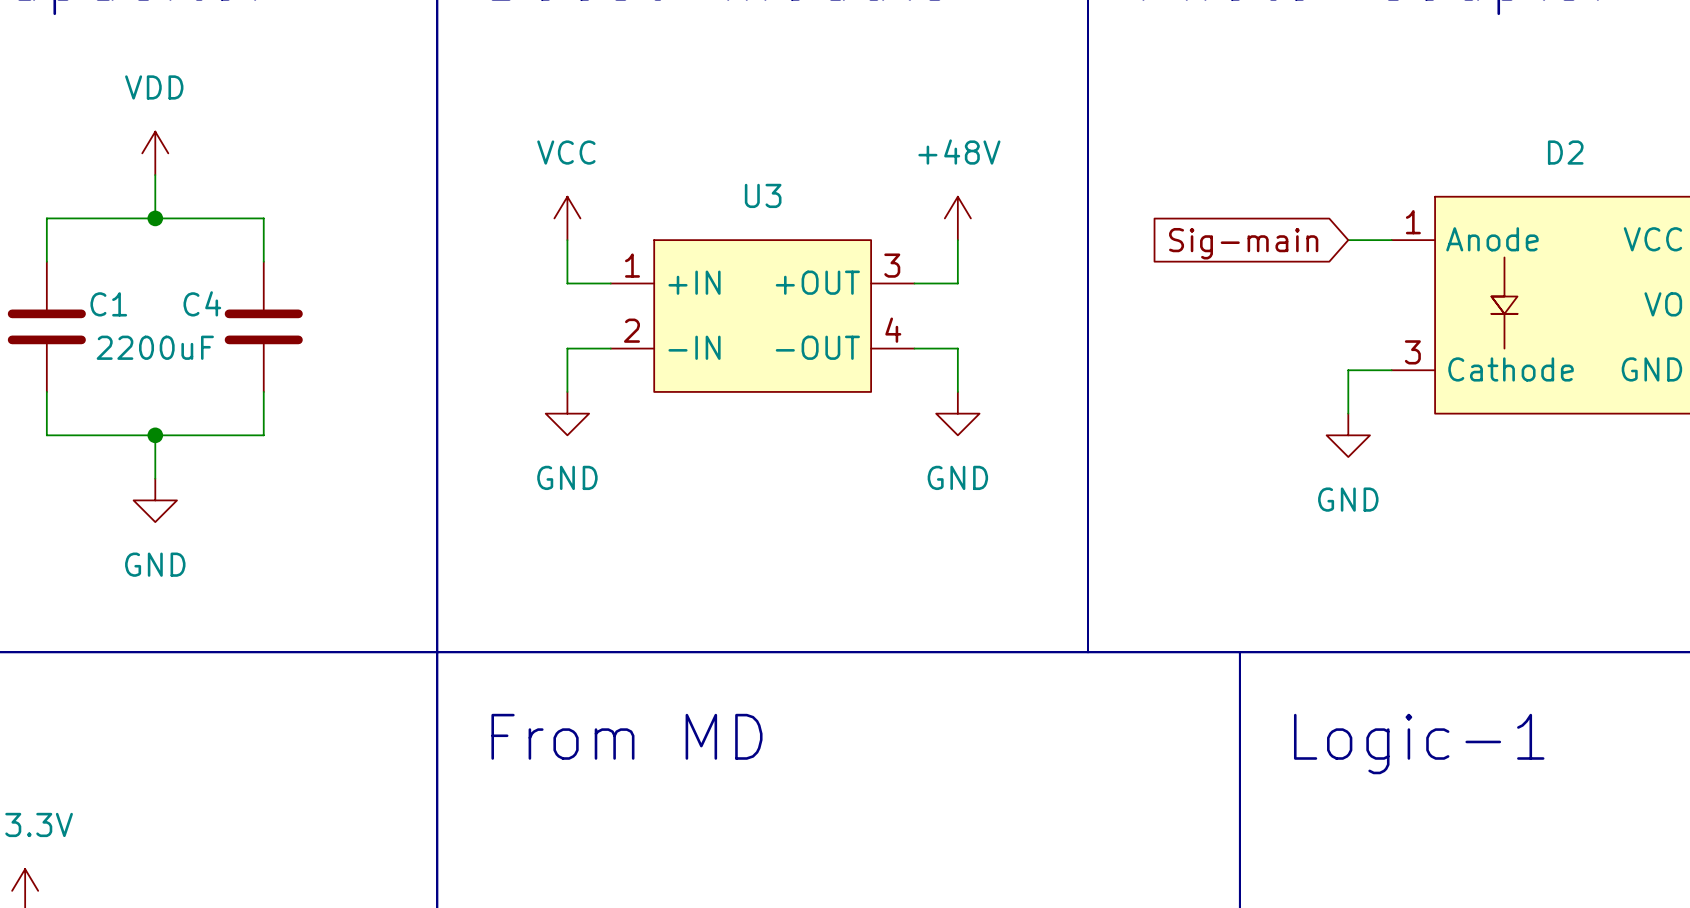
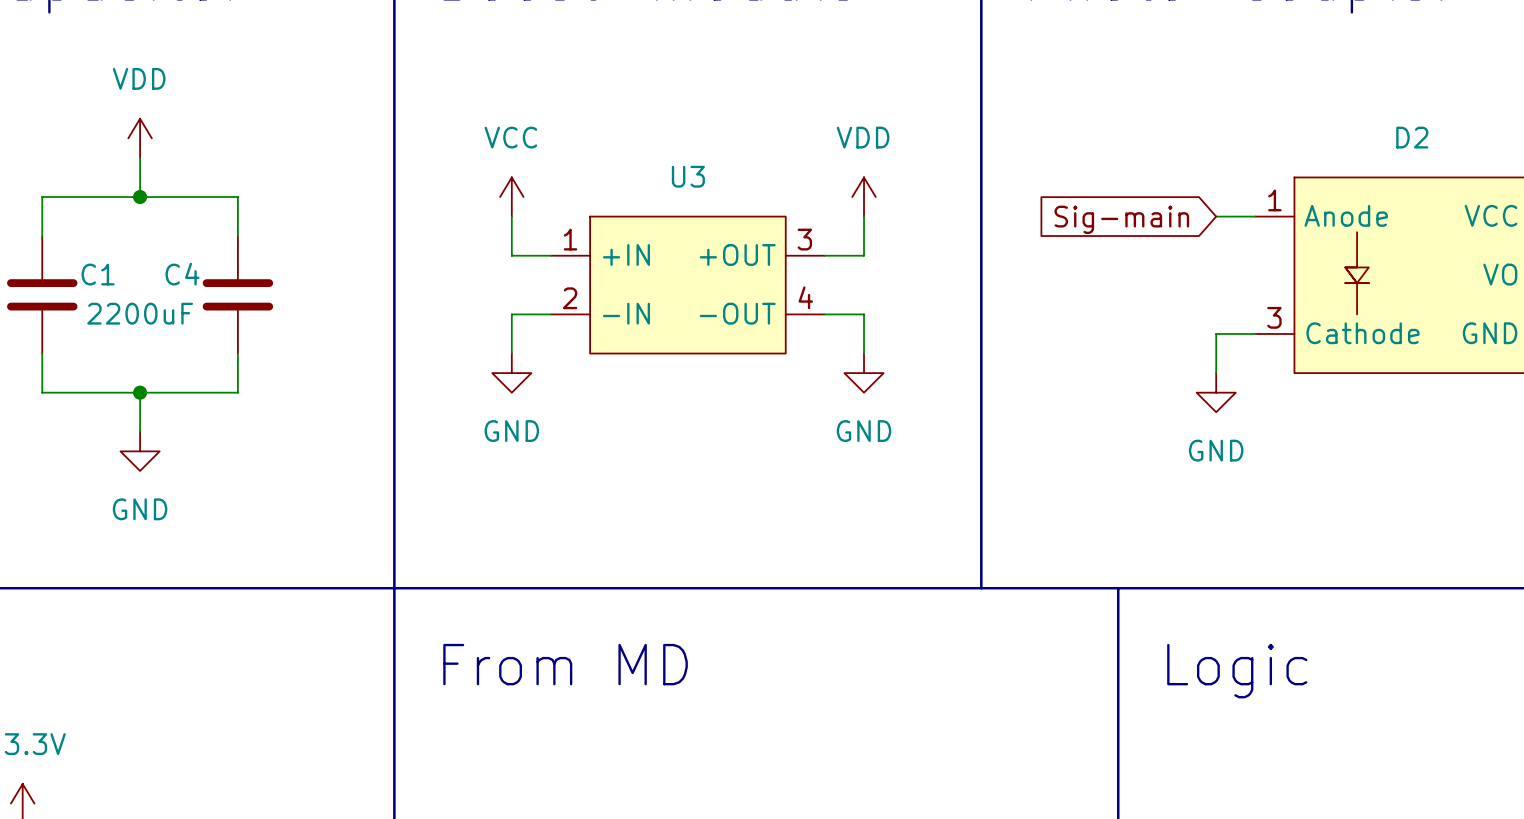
power symbol: +48V (957, 218) -> VDD (864, 197)
text: Logic-1 (1419, 744) -> Logic (1237, 671)

